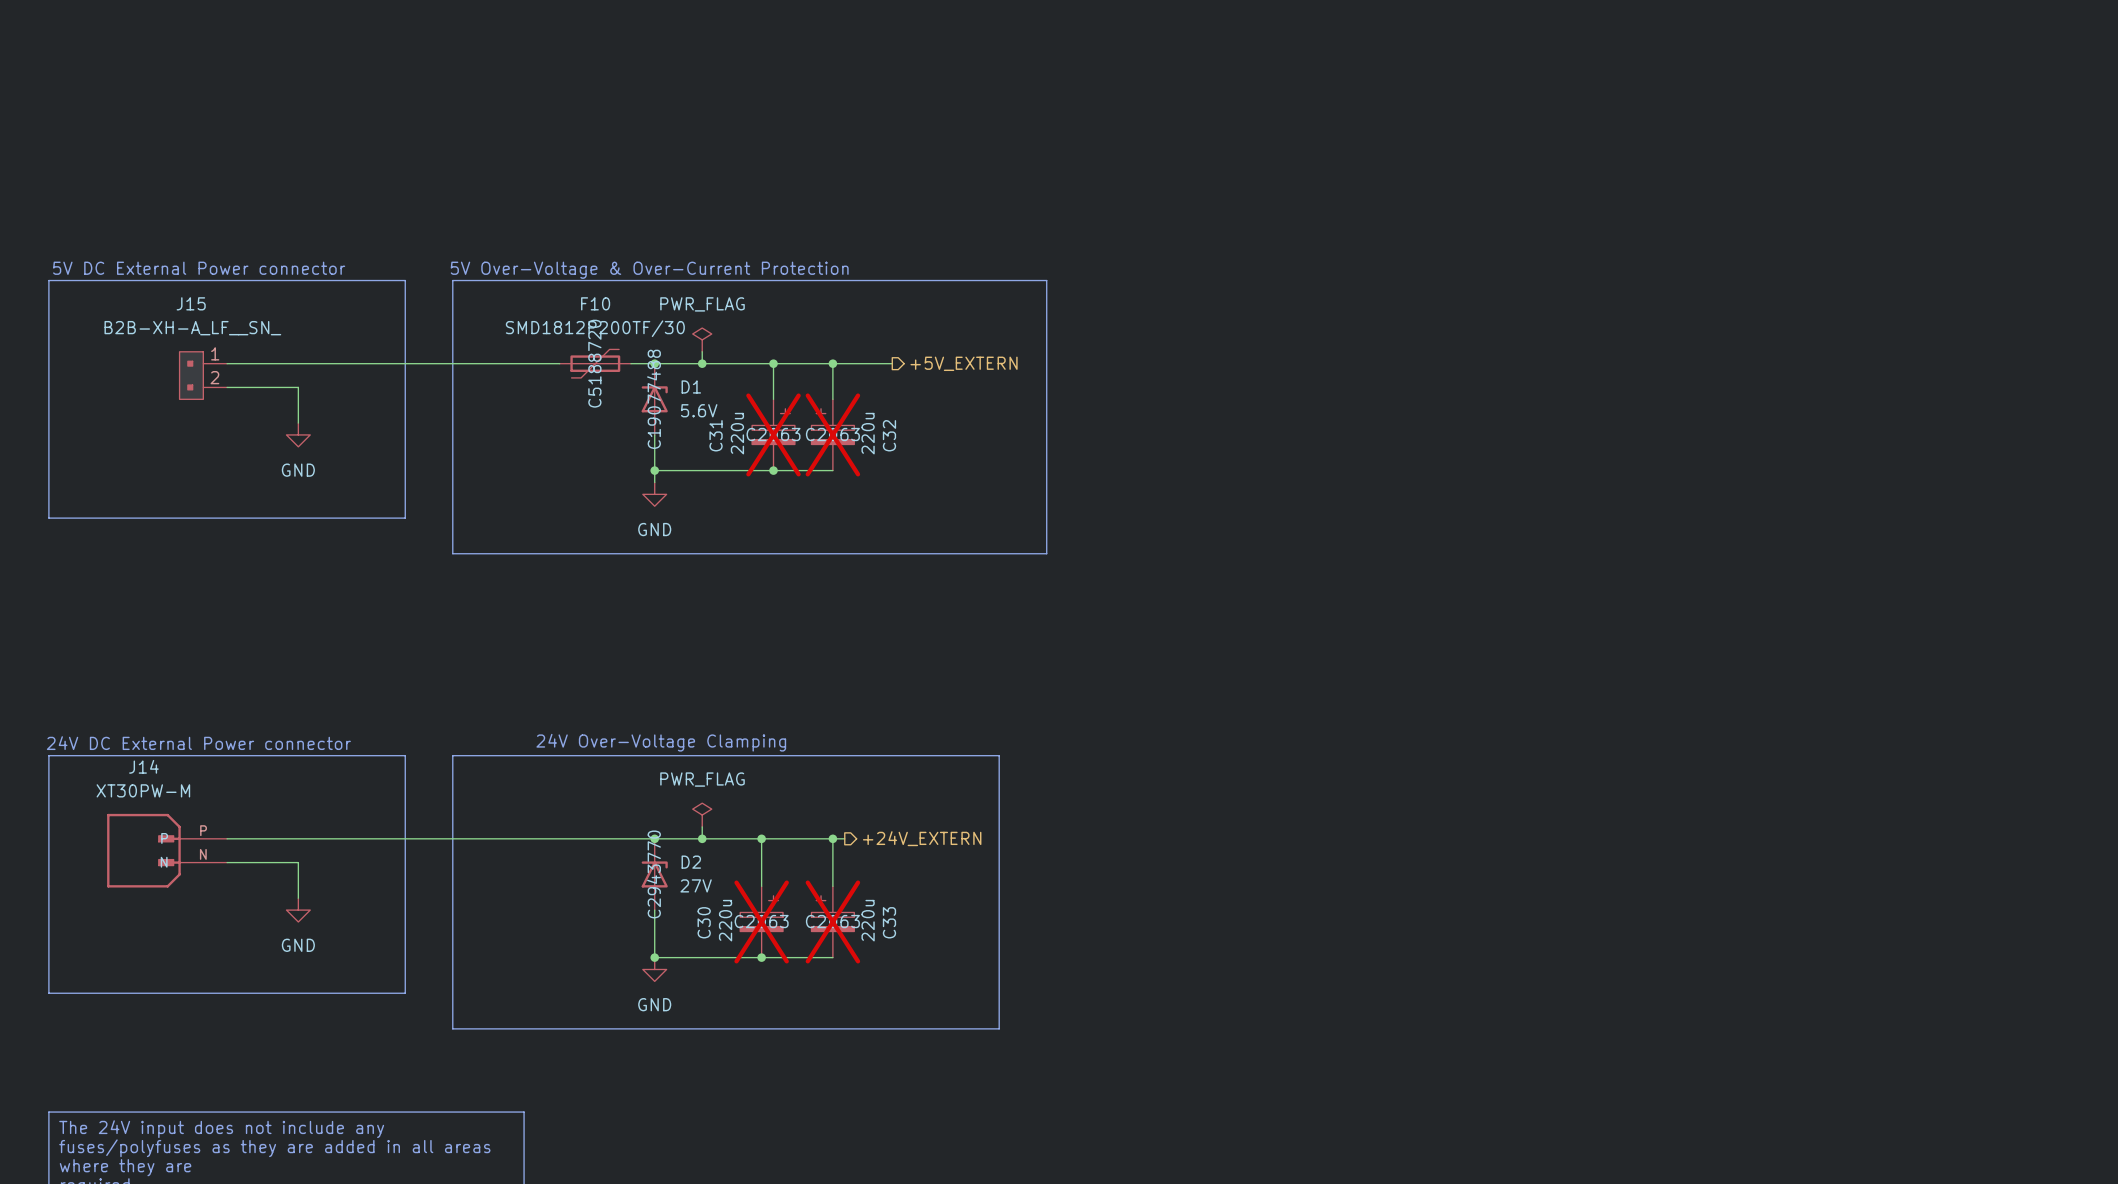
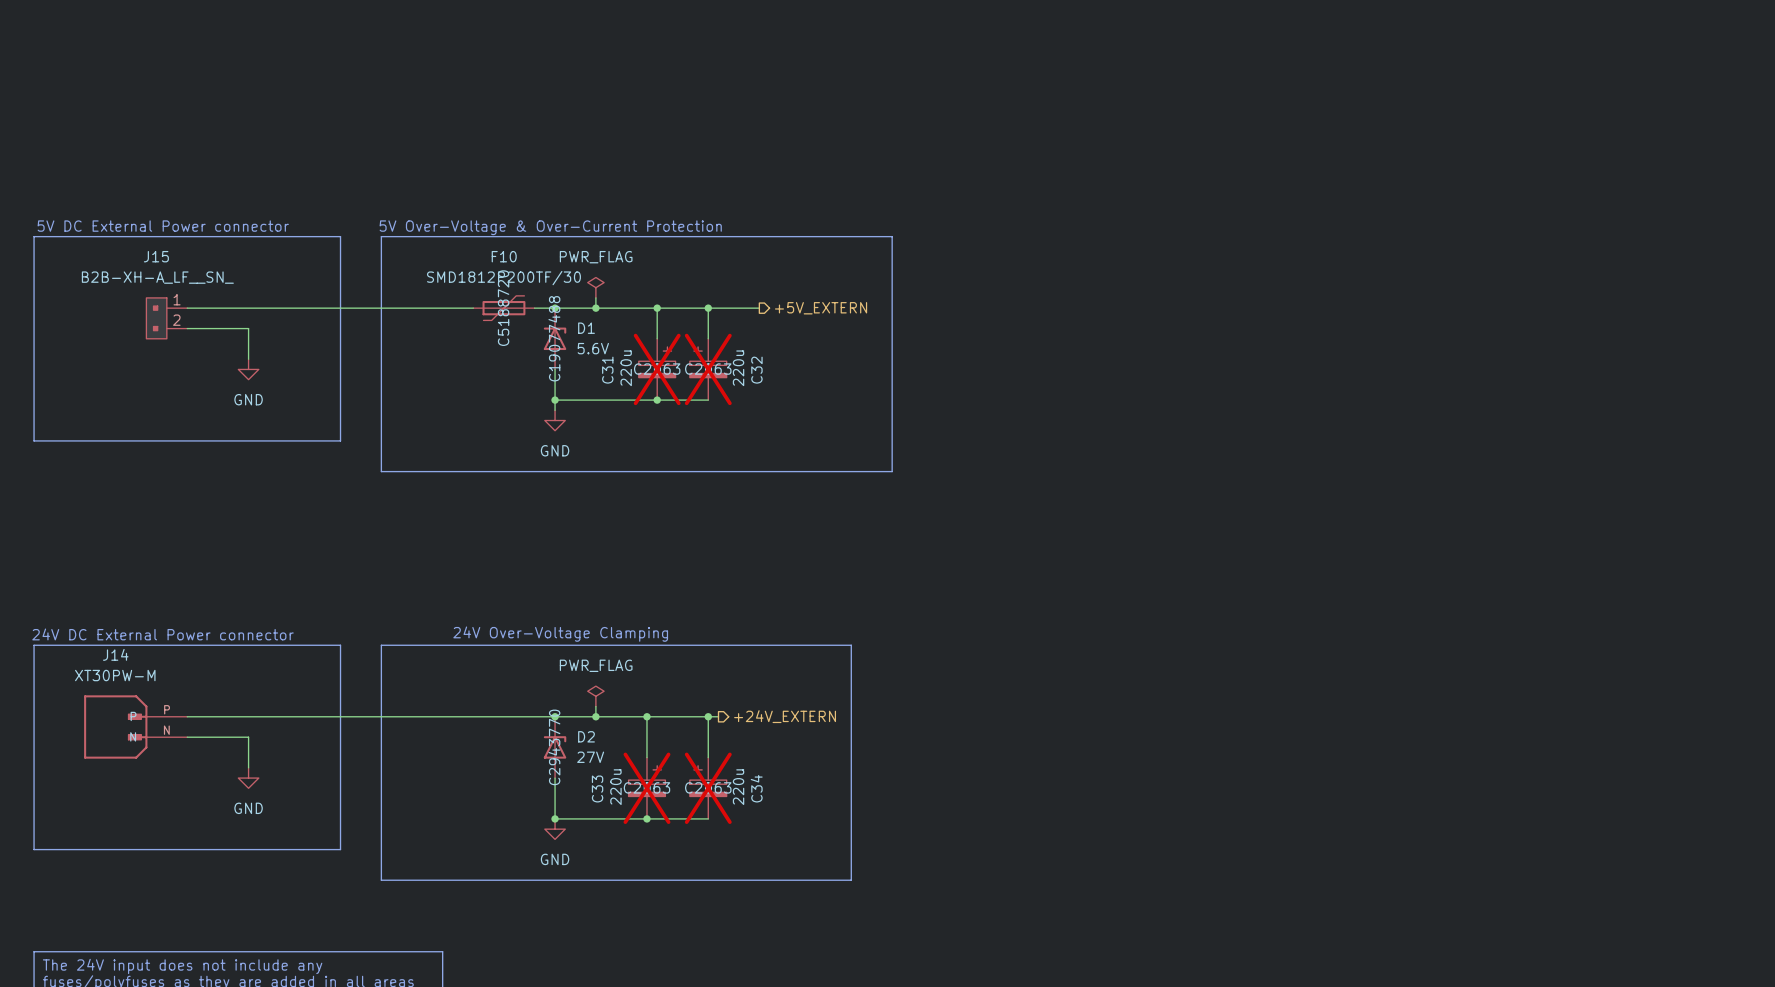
C30 name: C30 (704, 922) -> C33 (597, 788)
C33 name: C33 (889, 922) -> C34 (756, 788)

